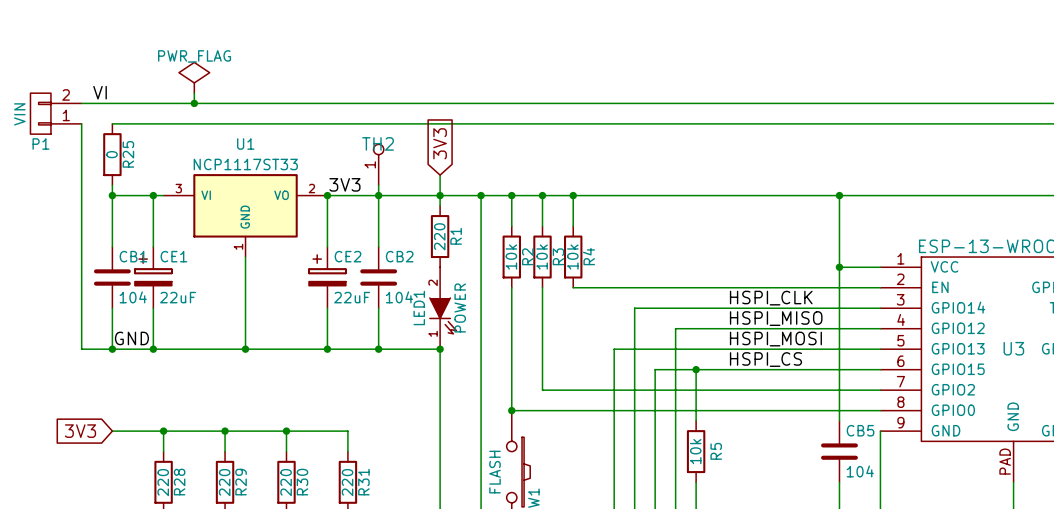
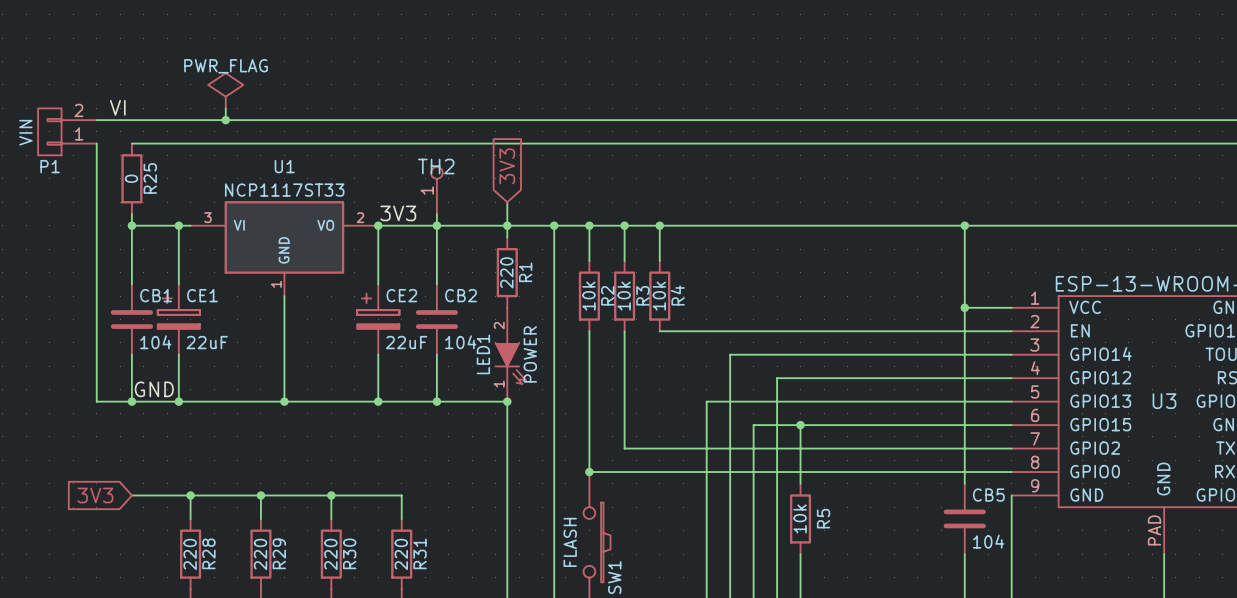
label: HSPI_CLK (771, 298) -> none
label: HSPI_MISO (776, 318) -> none
label: HSPI_MOSI (775, 339) -> none
label: HSPI_CS (765, 359) -> none

